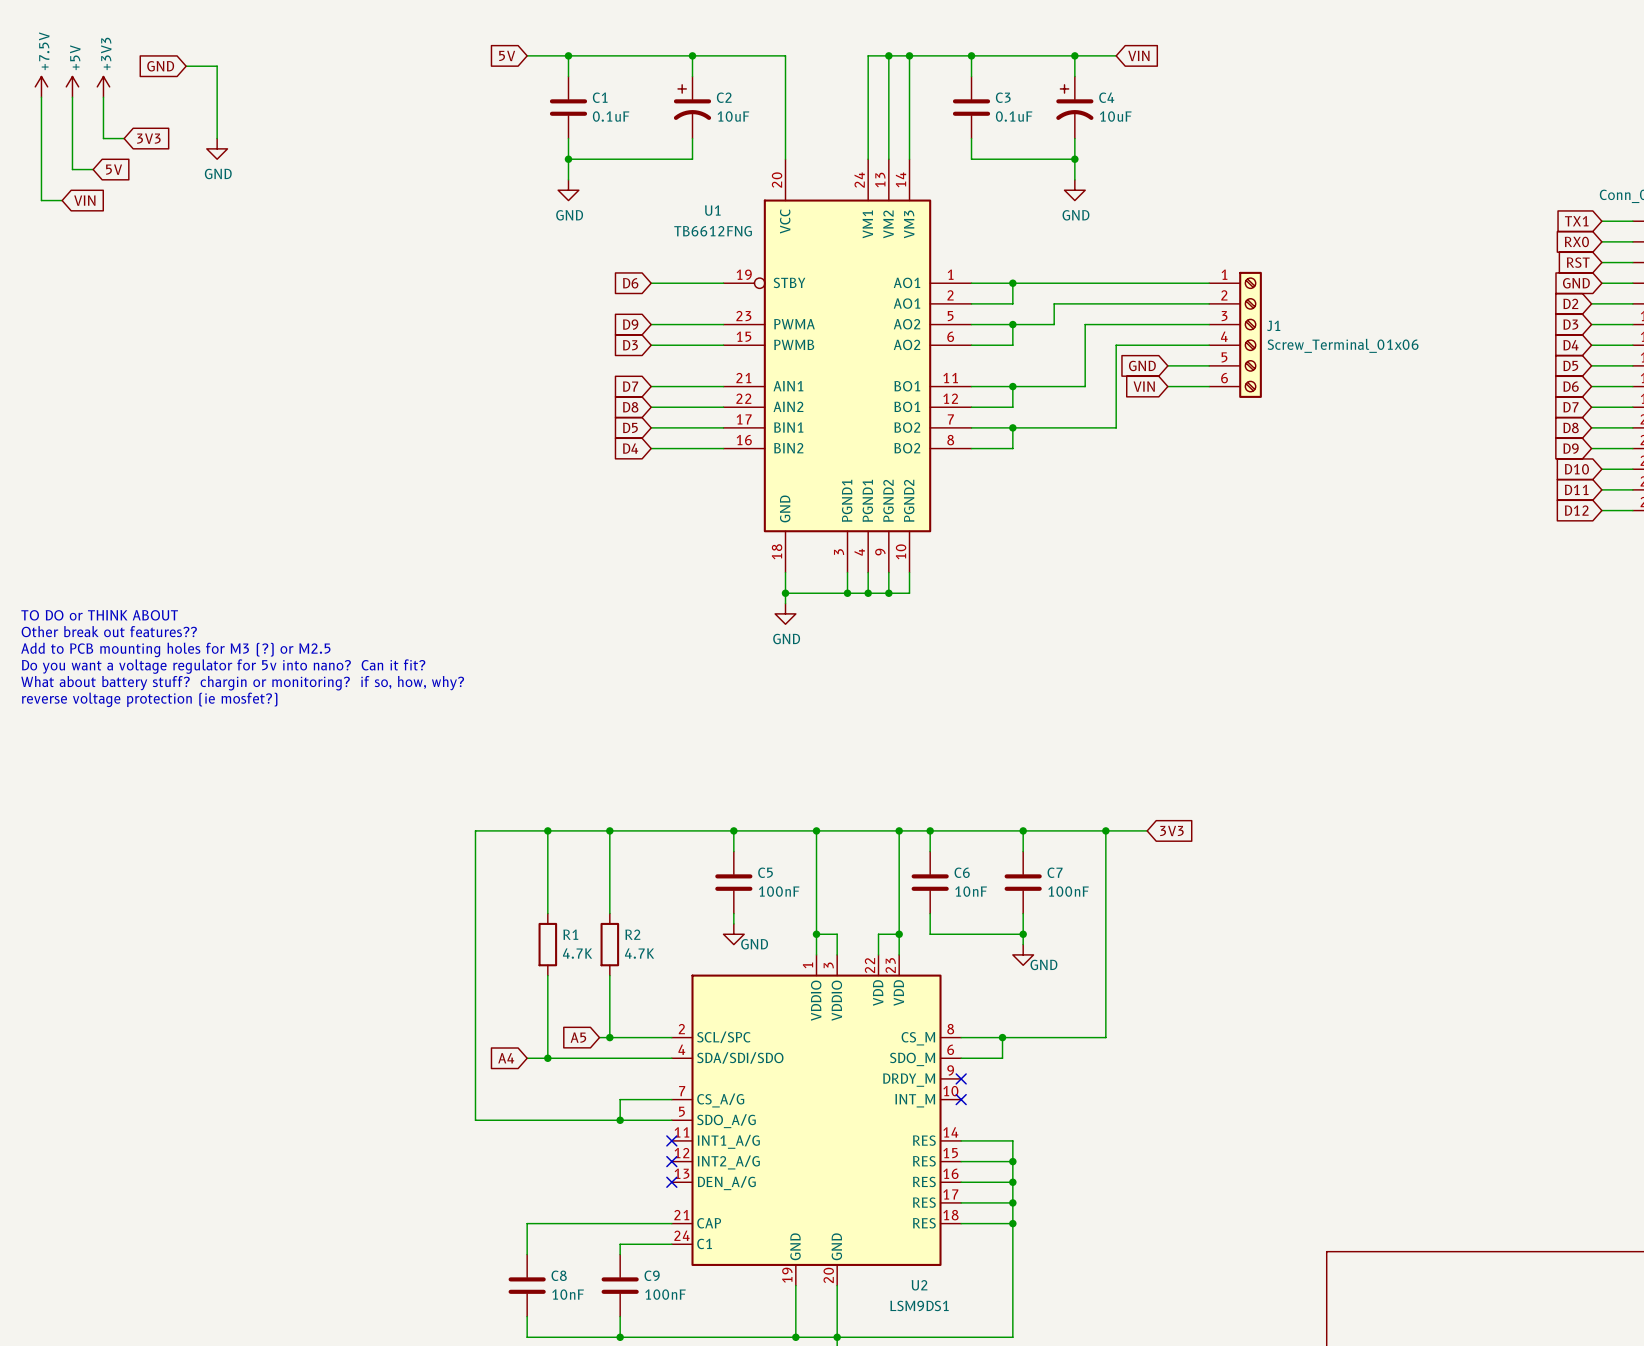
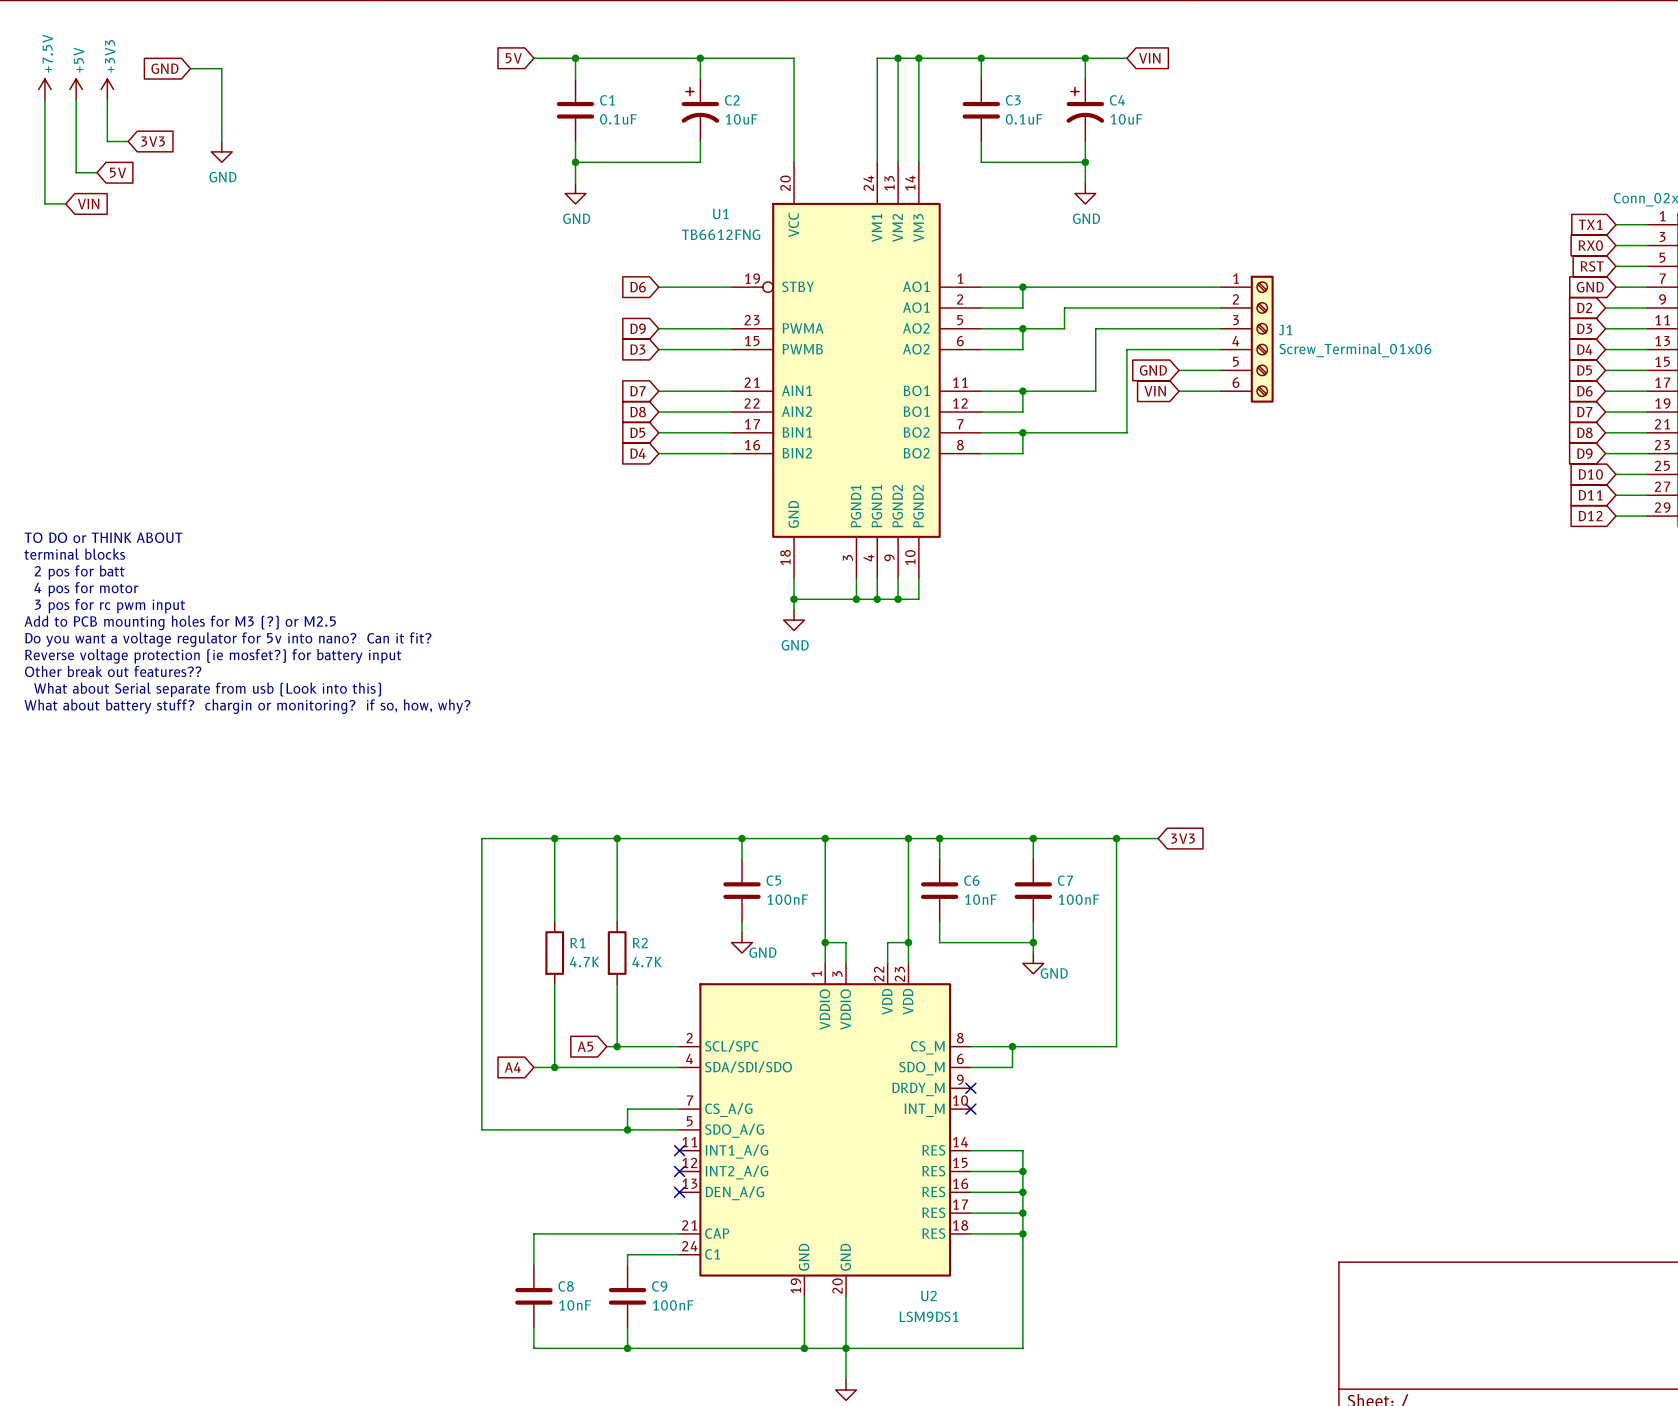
text: none -> TO DO or THINK ABOUT (103, 537)
text: none -> terminal blocks (74, 554)
text: none -> 2 pos for batt (79, 572)
text: none -> 4 pos for motor (86, 589)
text: none -> 3 pos for rc pwm input (110, 606)
text: TO DO or THINK ABOUT (99, 615) -> Add to PCB mounting holes for M3 (?) or M2.5 (180, 622)
text: Other break out features?? (109, 631) -> Do you want a voltage regulator for 5v into nano? Can it fit? (228, 639)
text: Add to PCB mounting holes for M3 (?) or M2.5 (175, 649) -> Reverse voltage protection (ie mosfet?) for battery input (213, 656)
text: Do you want a voltage regulator for 5v into nano? Can it fit? (223, 666) -> Other break out features?? (113, 671)
text: What about battery stuff? chargin or monitoring? if so, how, why? (242, 683) -> What about Serial separate from usb (Look into this) (207, 689)
text: reverse voltage protection (ie mosfet?) (149, 699) -> What about battery stuff? chargin or monitoring? if so, how, why? (247, 706)

